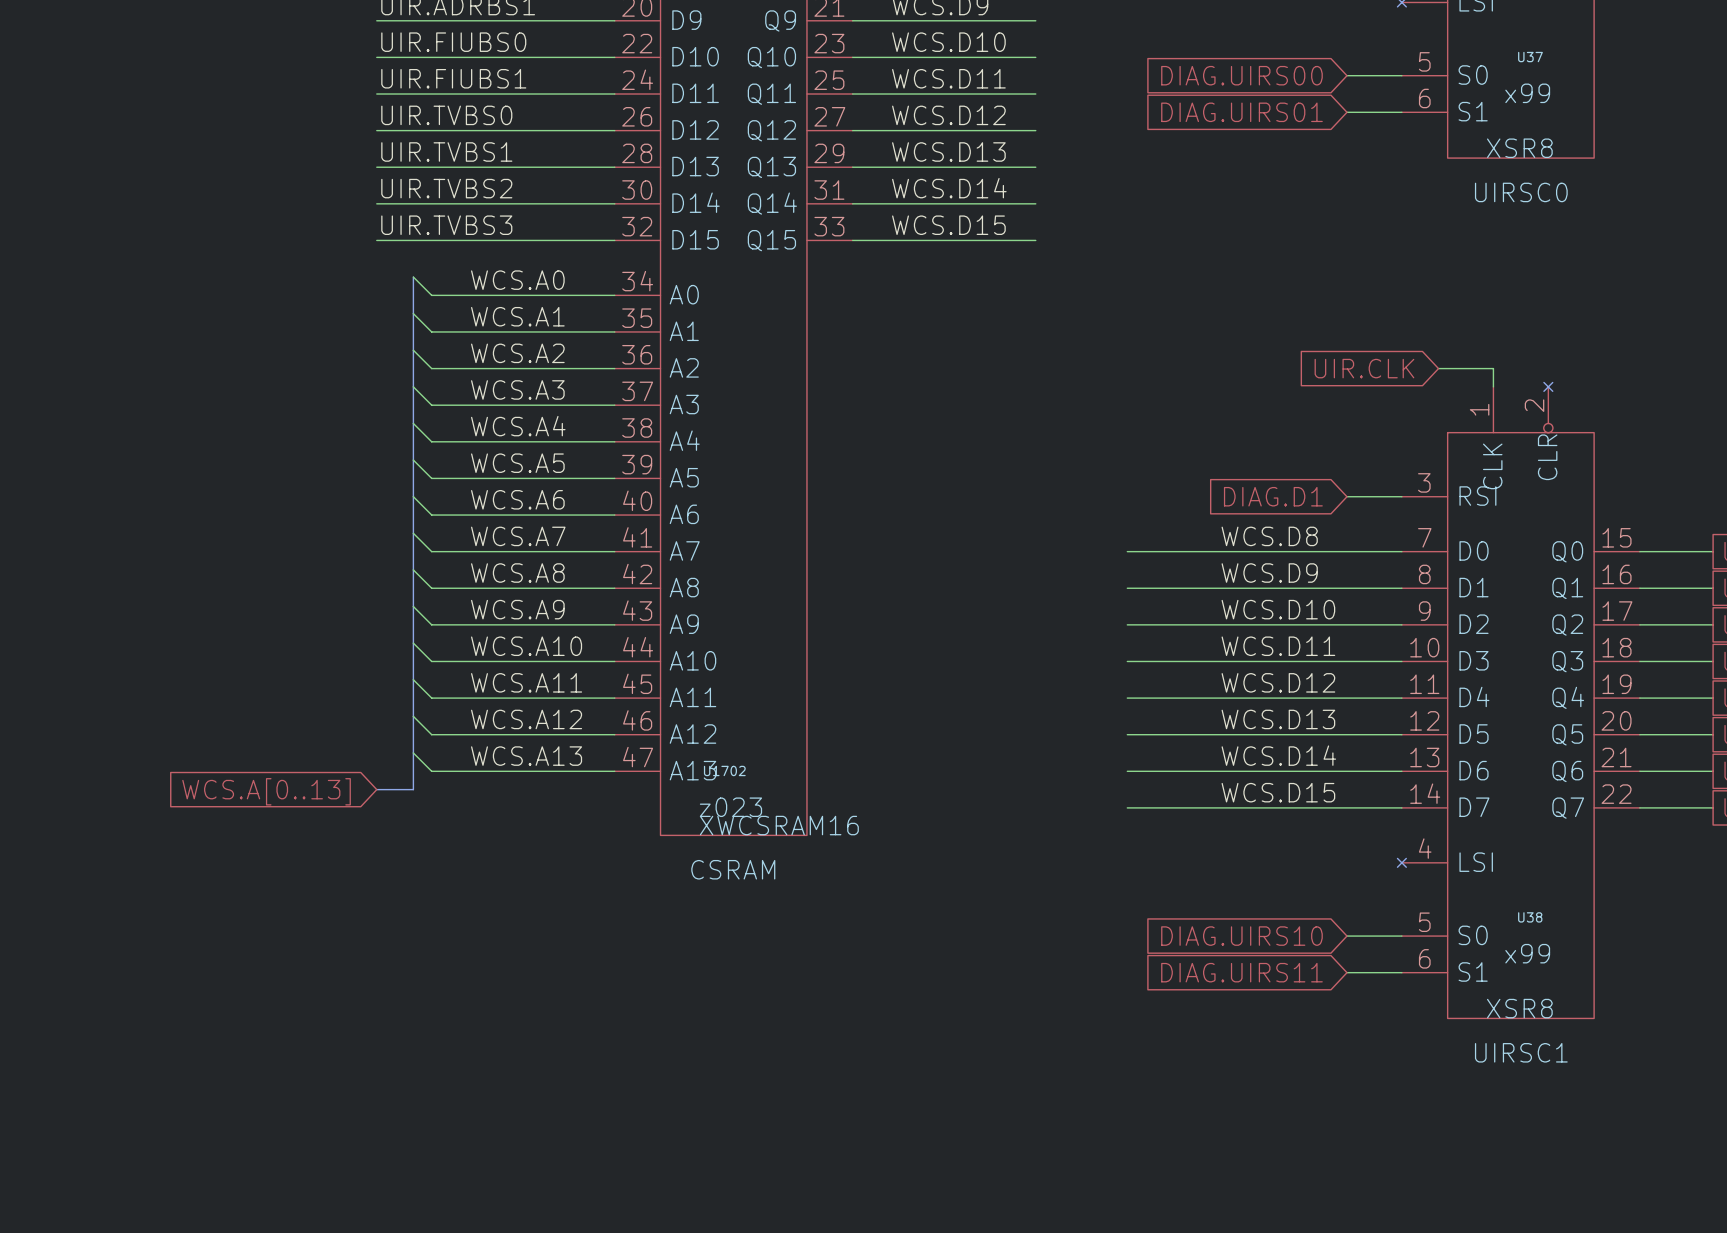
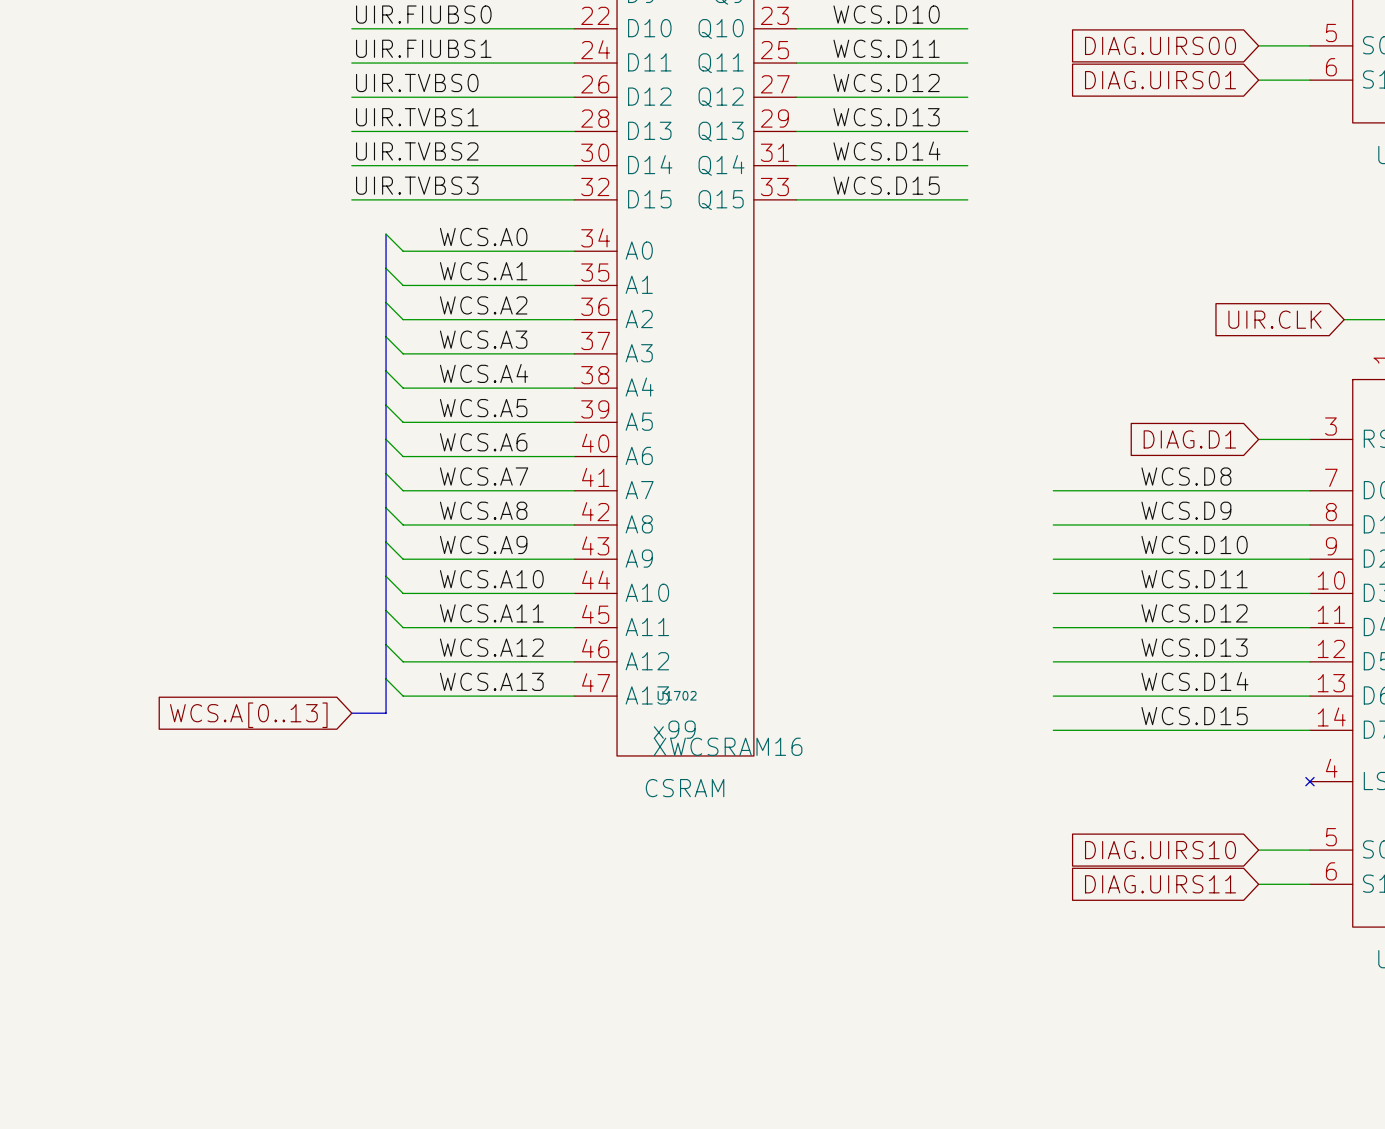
U1702 text: z023 (730, 807) -> x99 (674, 729)

